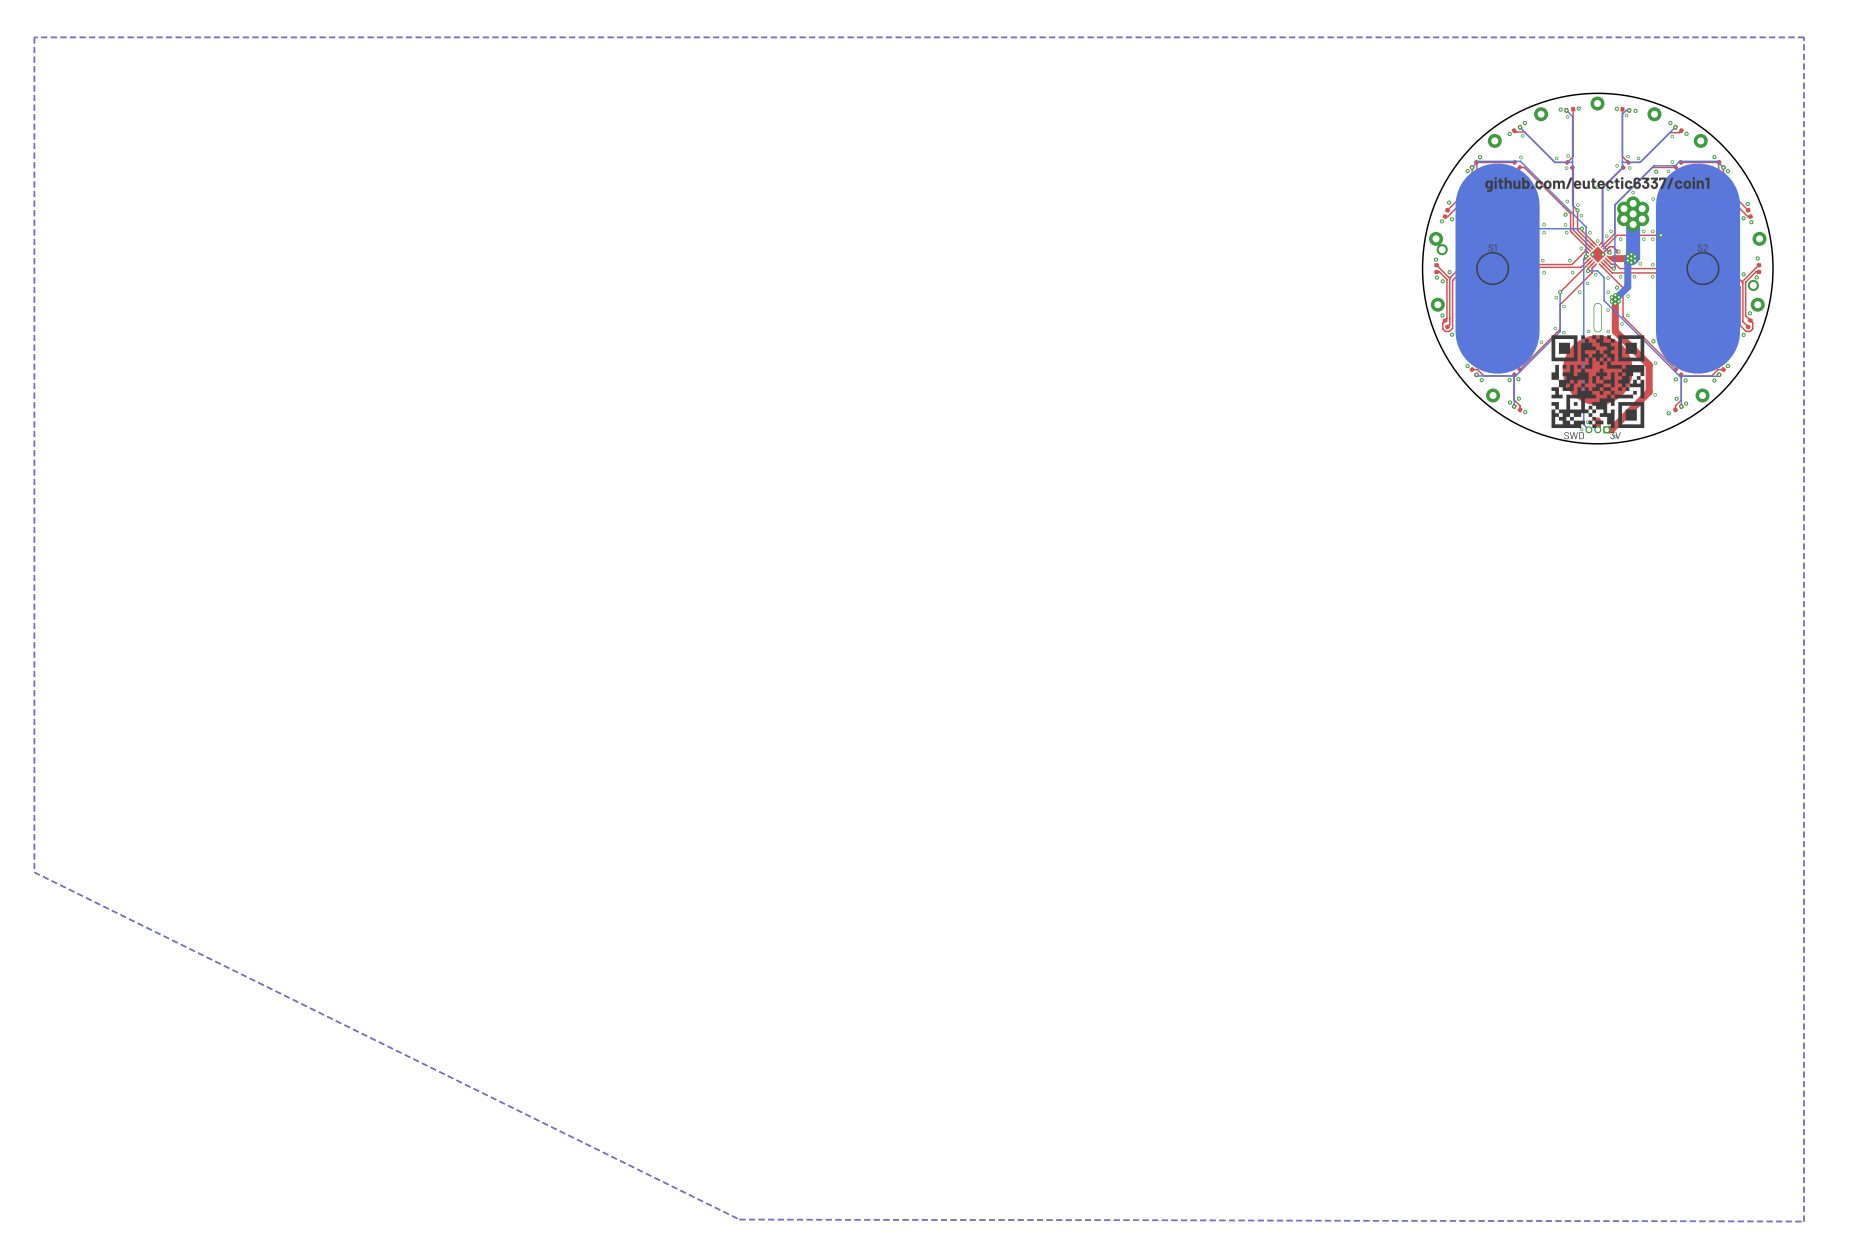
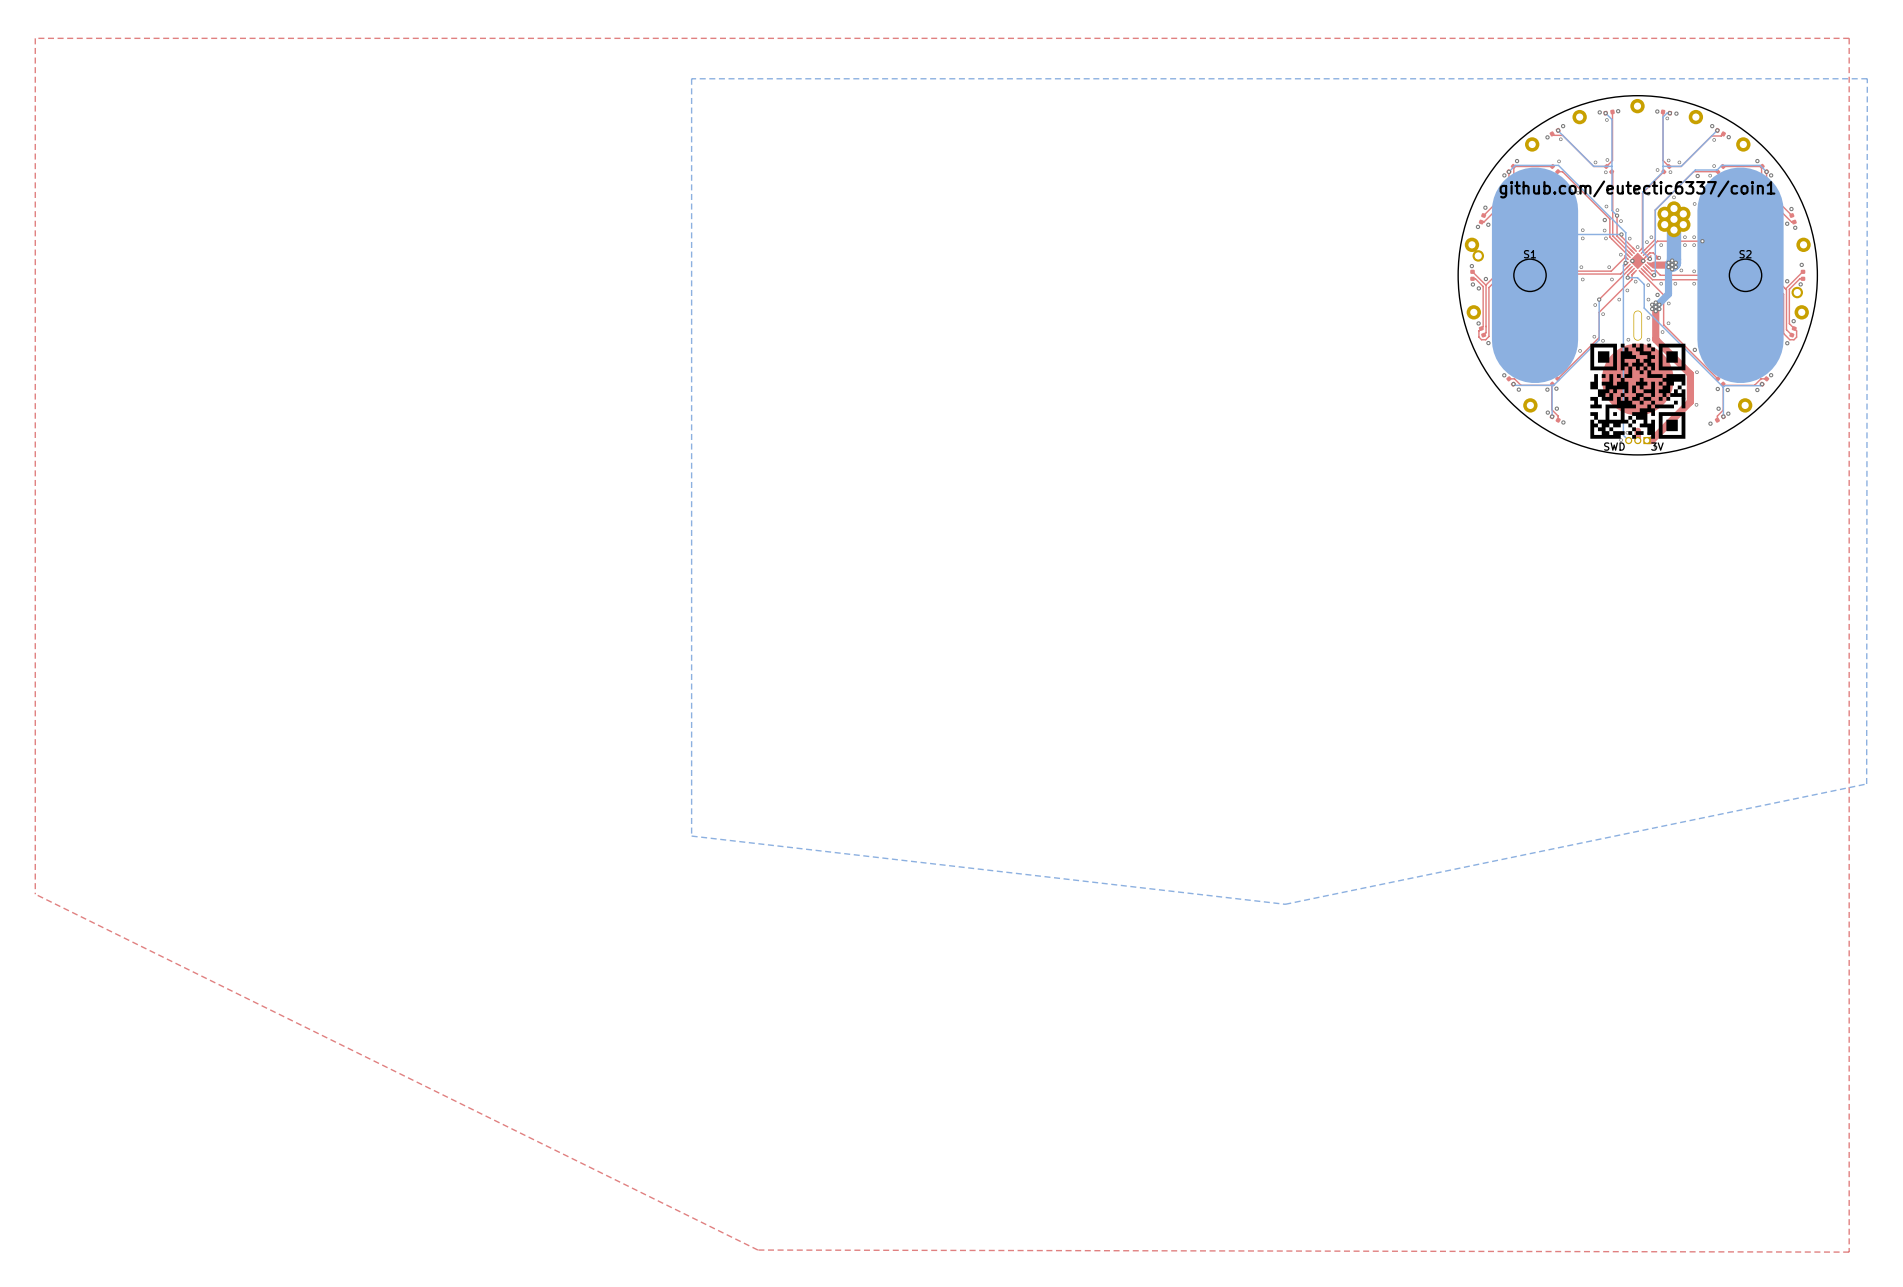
bottom zone outline: (1804, 37) (34, 37) (34, 872) (739, 1219) (1804, 1221) (1804, 37) -> none
bottom zone outline: none -> (1867, 78) (691, 78) (691, 836) (1285, 904) (1866, 783) (1867, 78)

